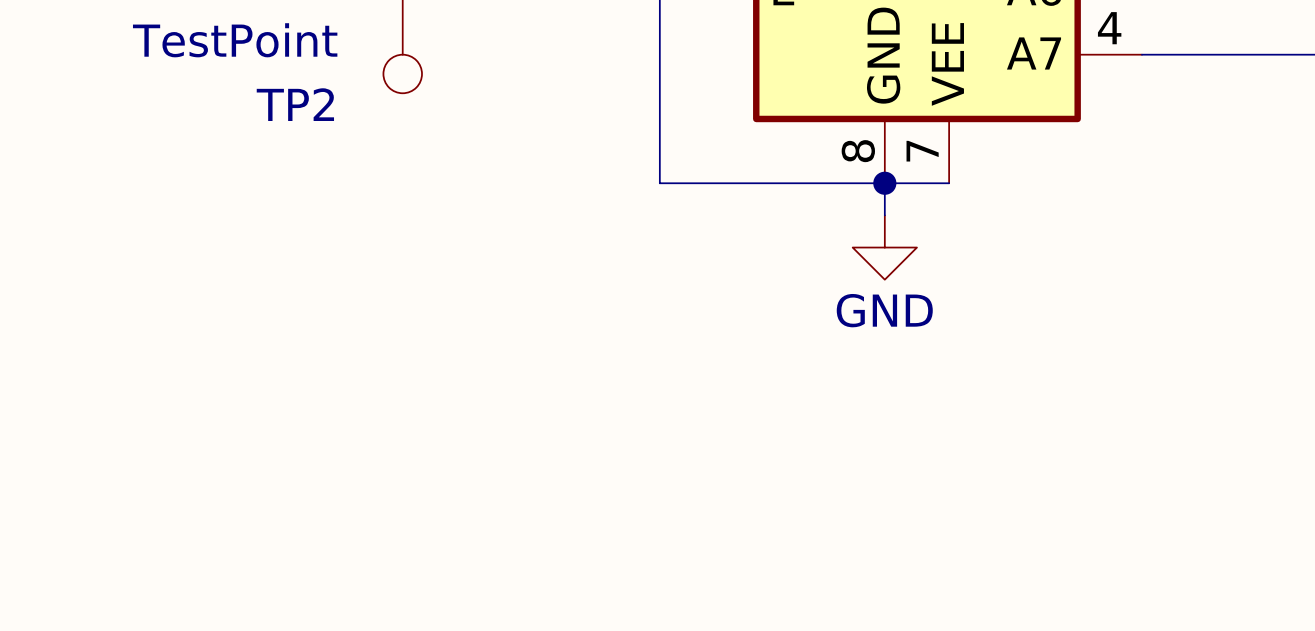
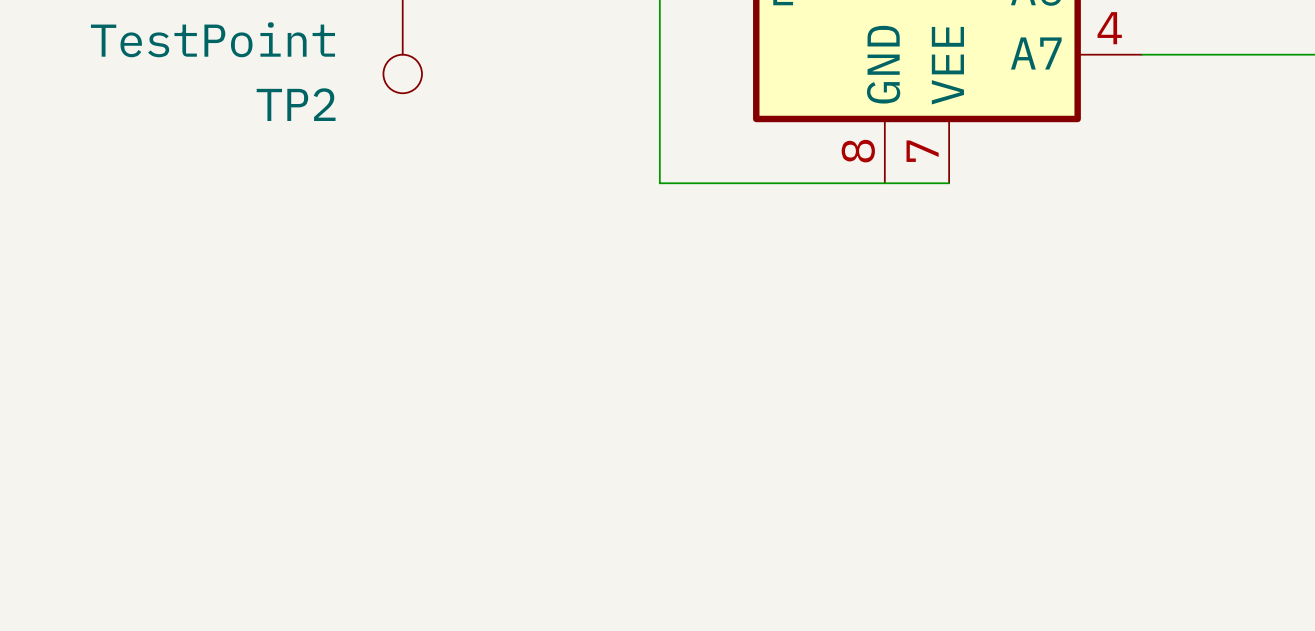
wire: (884, 183) (884, 215) -> none
junction: (884, 183) -> none
power symbol: GND (884, 247) -> none

